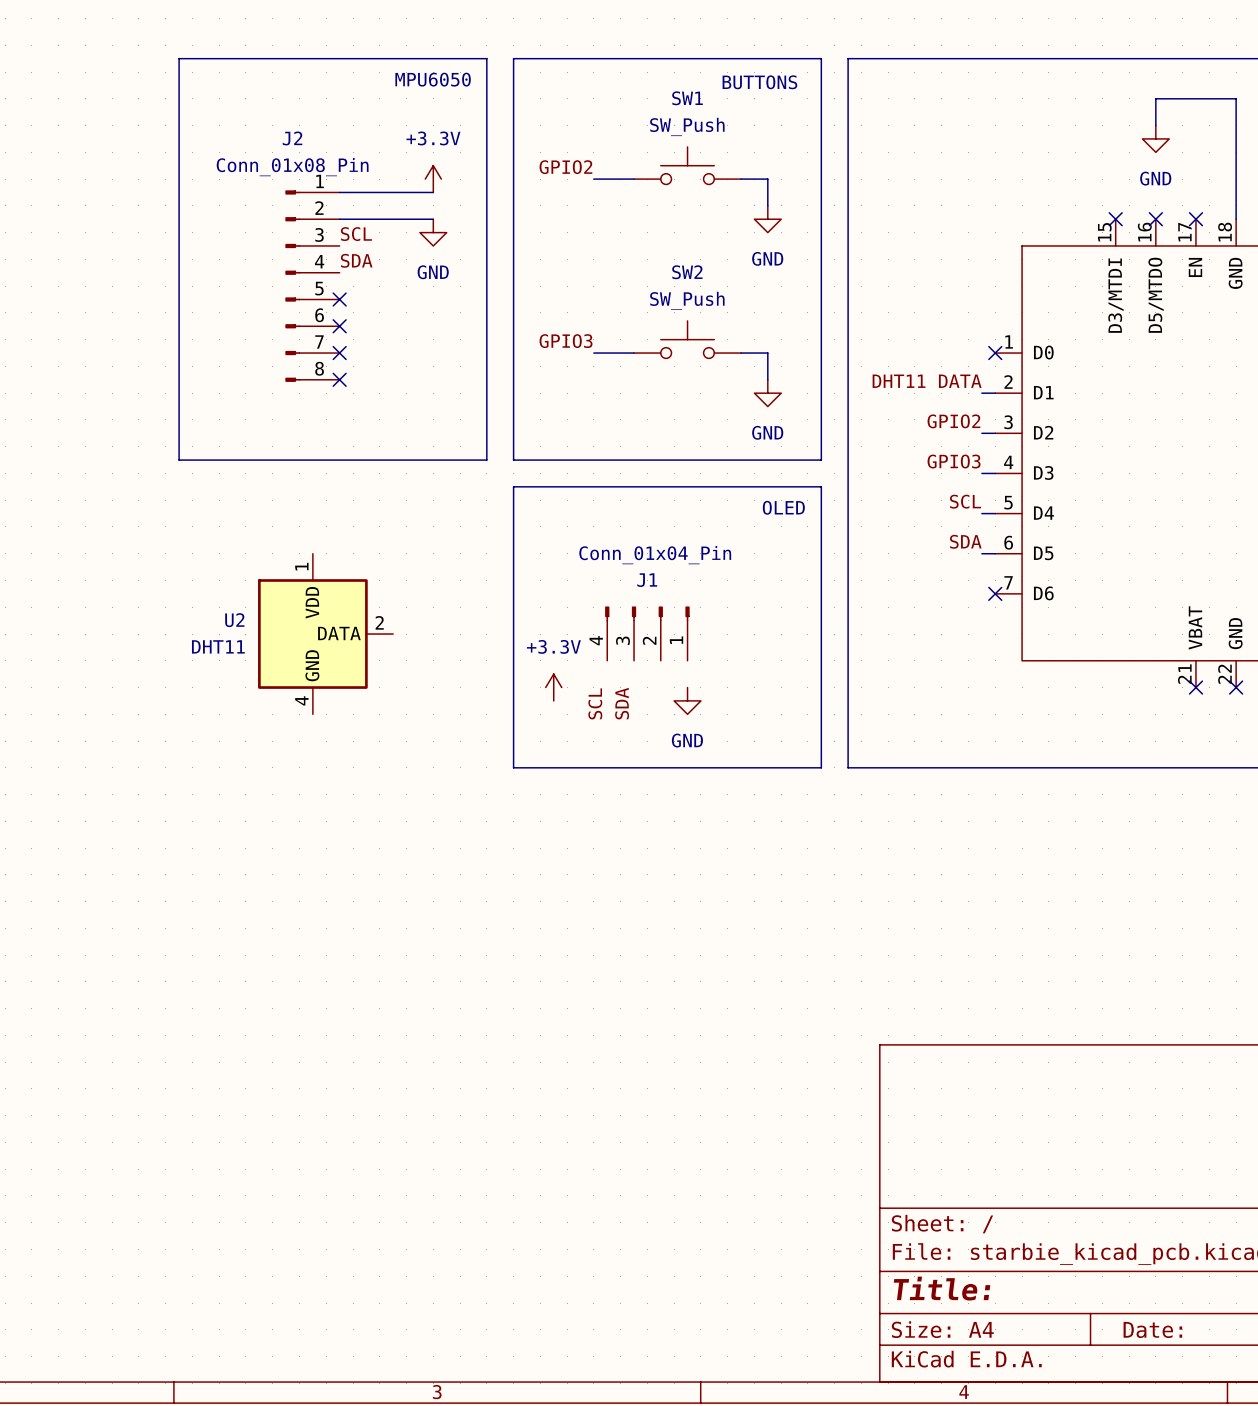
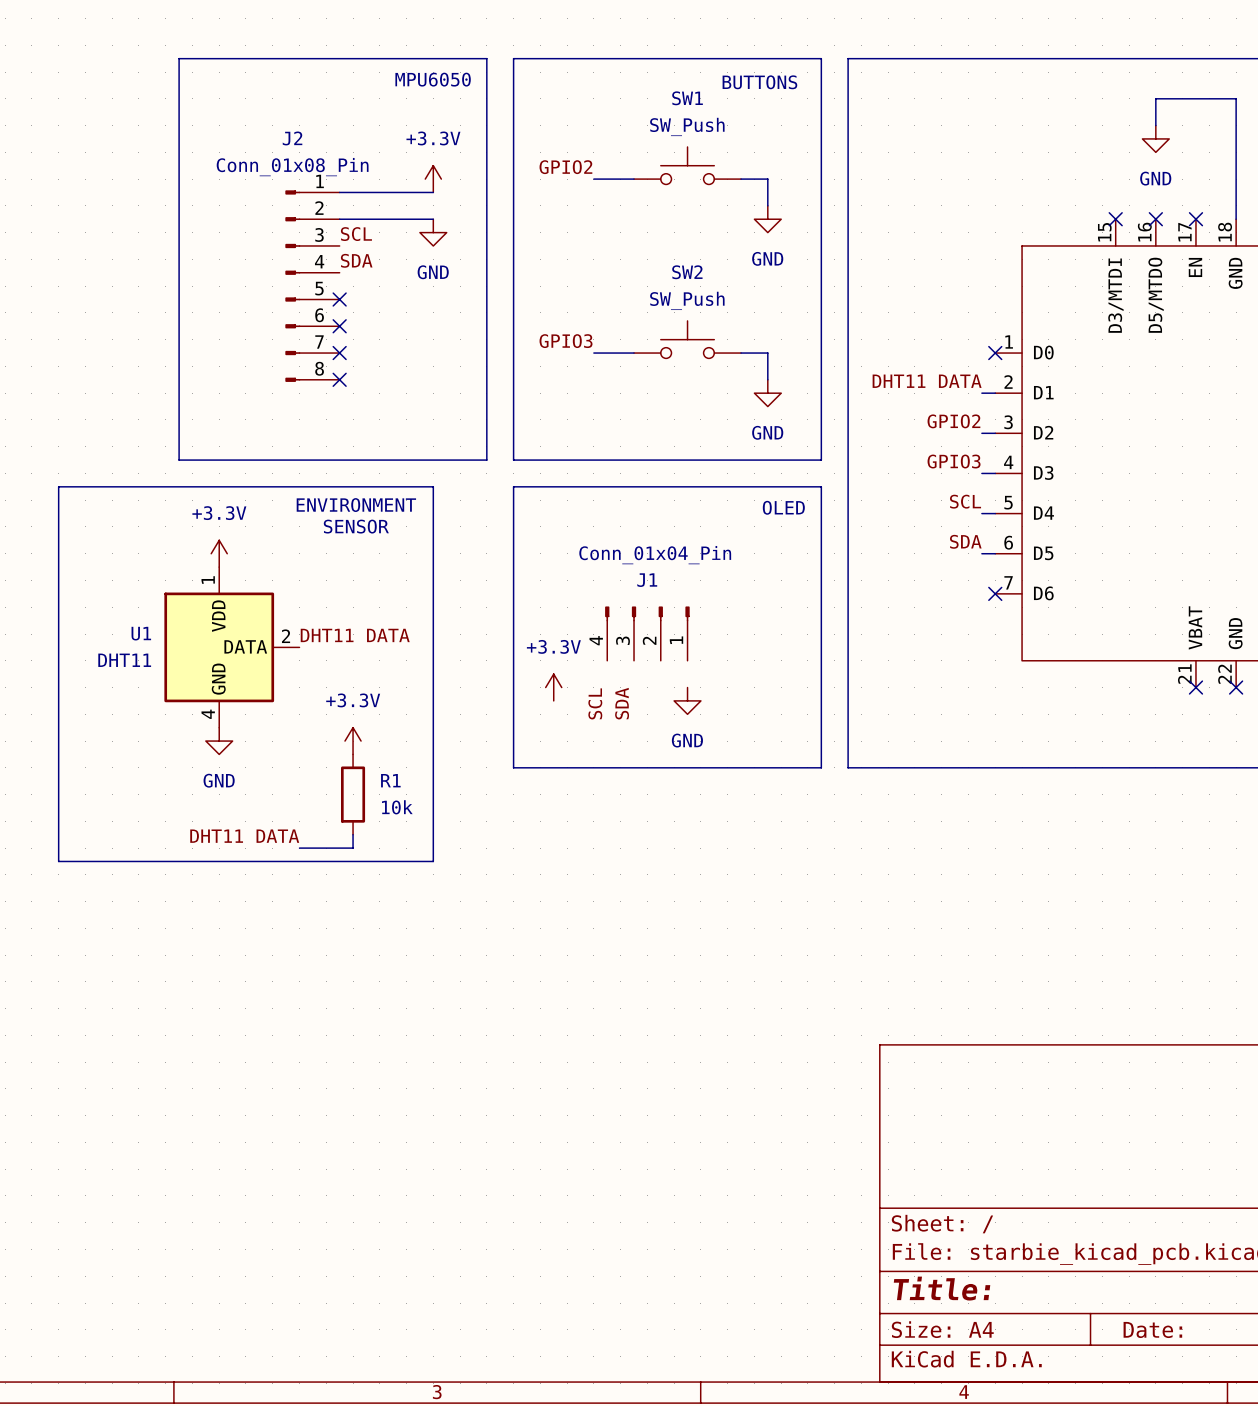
line: none -> (58, 486) (433, 486) (433, 861) (58, 861) (58, 486)
text: none -> ENVIRONMENT (356, 505)
text: none -> SENSOR (356, 526)
power symbol: none -> +3.3V (219, 553)
U2: DHT11 (325, 634) -> none
label: none -> DHT11 DATA (355, 635)
U1: none -> DHT11 (231, 647)
power symbol: none -> GND (219, 741)
power symbol: none -> +3.3V (353, 741)
R1: none -> 10k (353, 794)
wire: none -> (353, 834) (353, 848) (299, 848)
label: none -> DHT11 DATA (244, 836)

